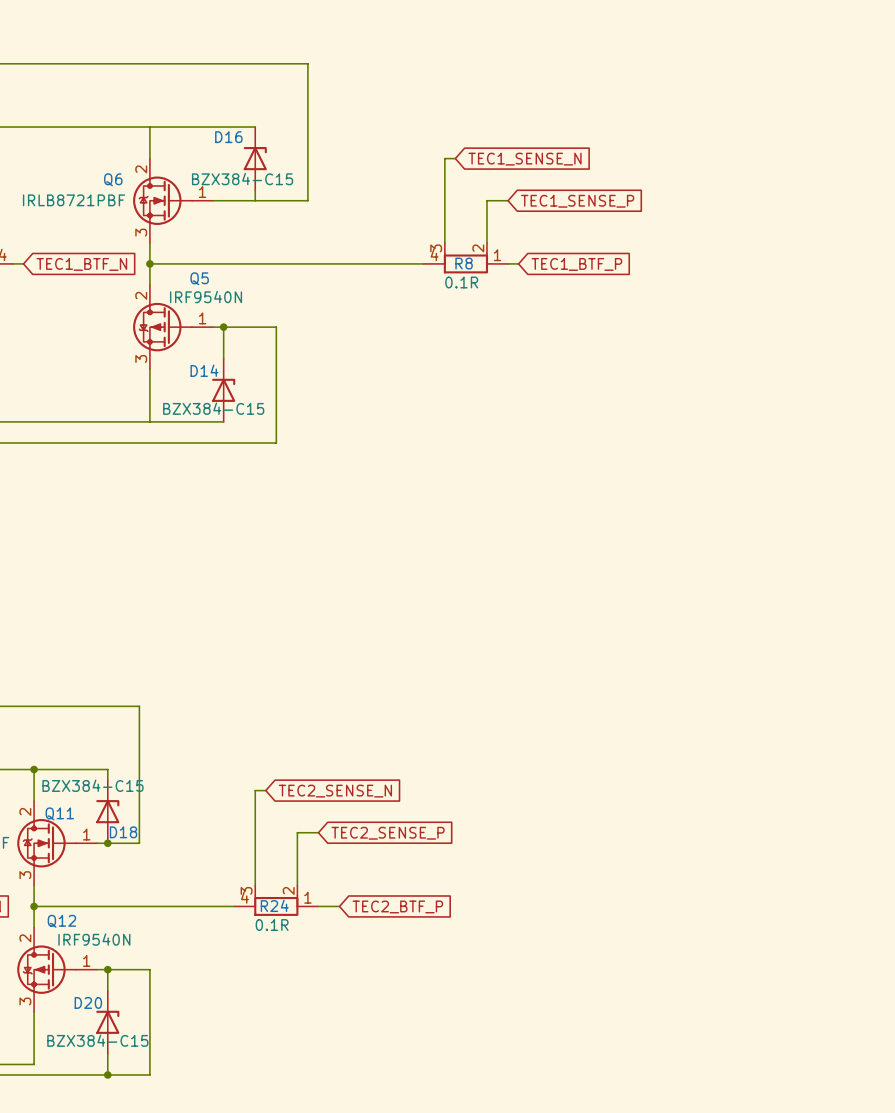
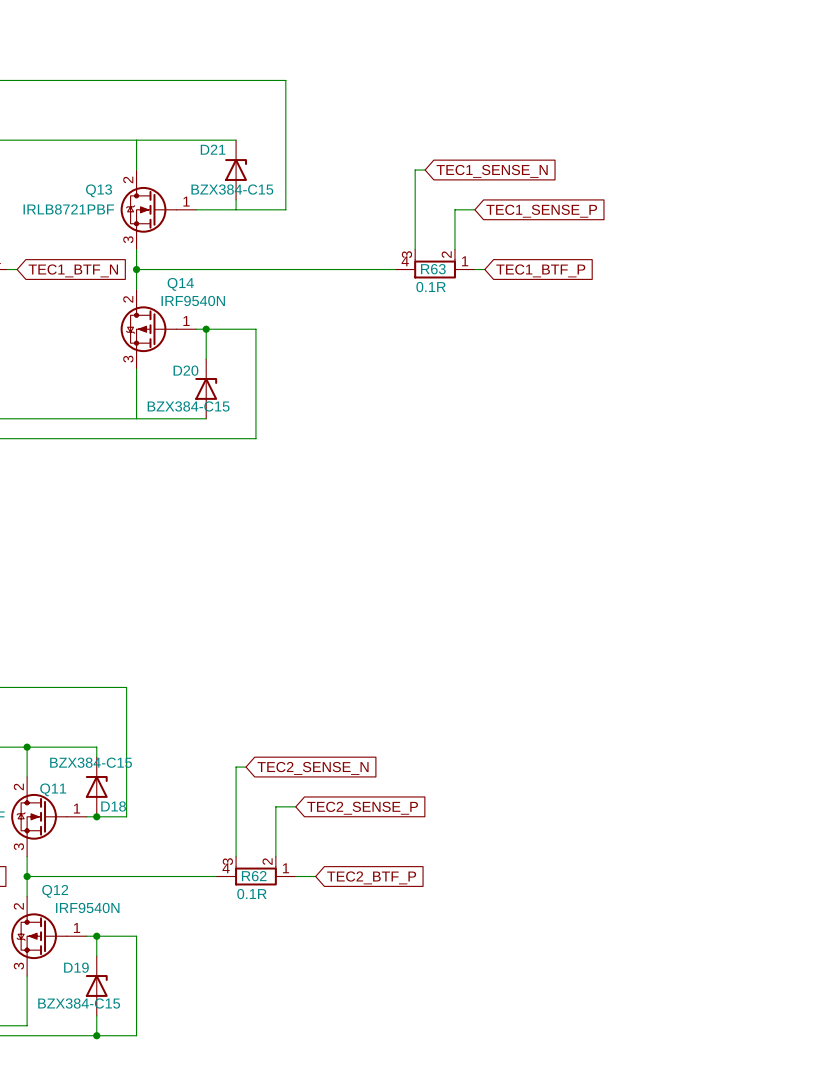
D16 name: D16 (228, 137) -> D21 (213, 149)
Q6 name: Q6 (113, 179) -> Q13 (99, 190)
R8 name: R8 (464, 263) -> R63 (433, 269)
Q5 name: Q5 (199, 278) -> Q14 (180, 284)
D14 name: D14 (204, 370) -> D20 (185, 370)
R24 name: R24 (274, 905) -> R62 (254, 876)
D20 name: D20 (88, 1002) -> D19 (76, 967)

